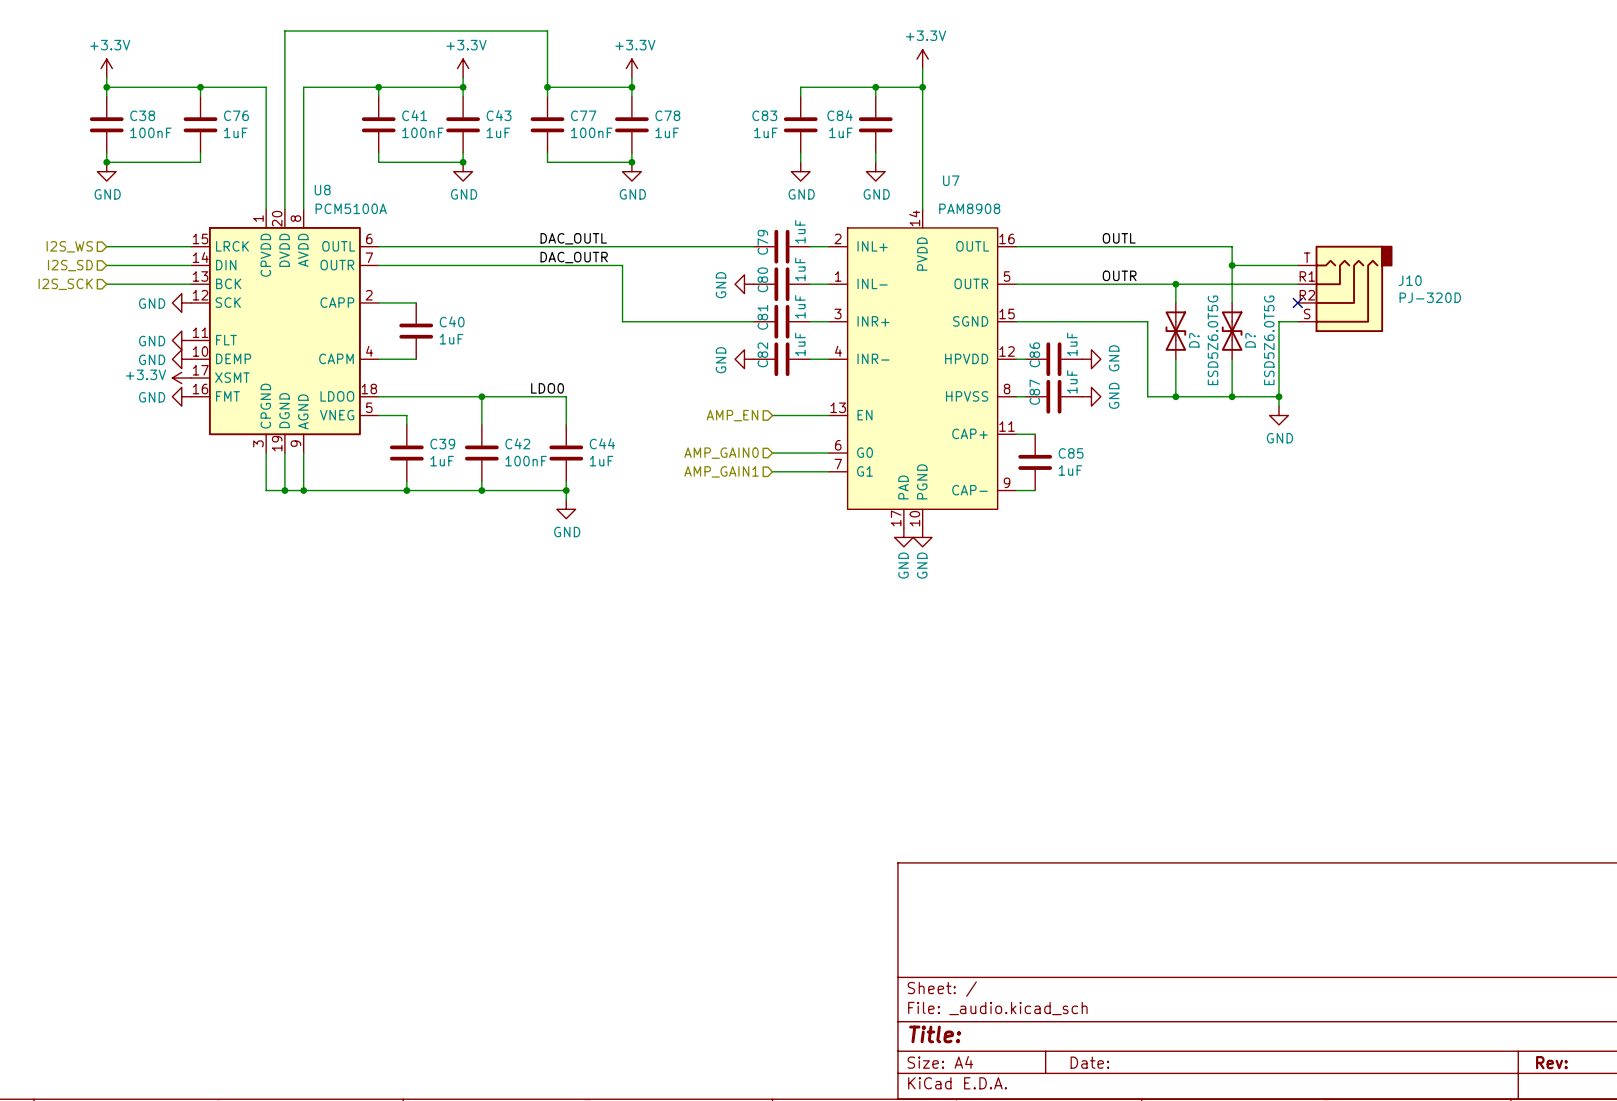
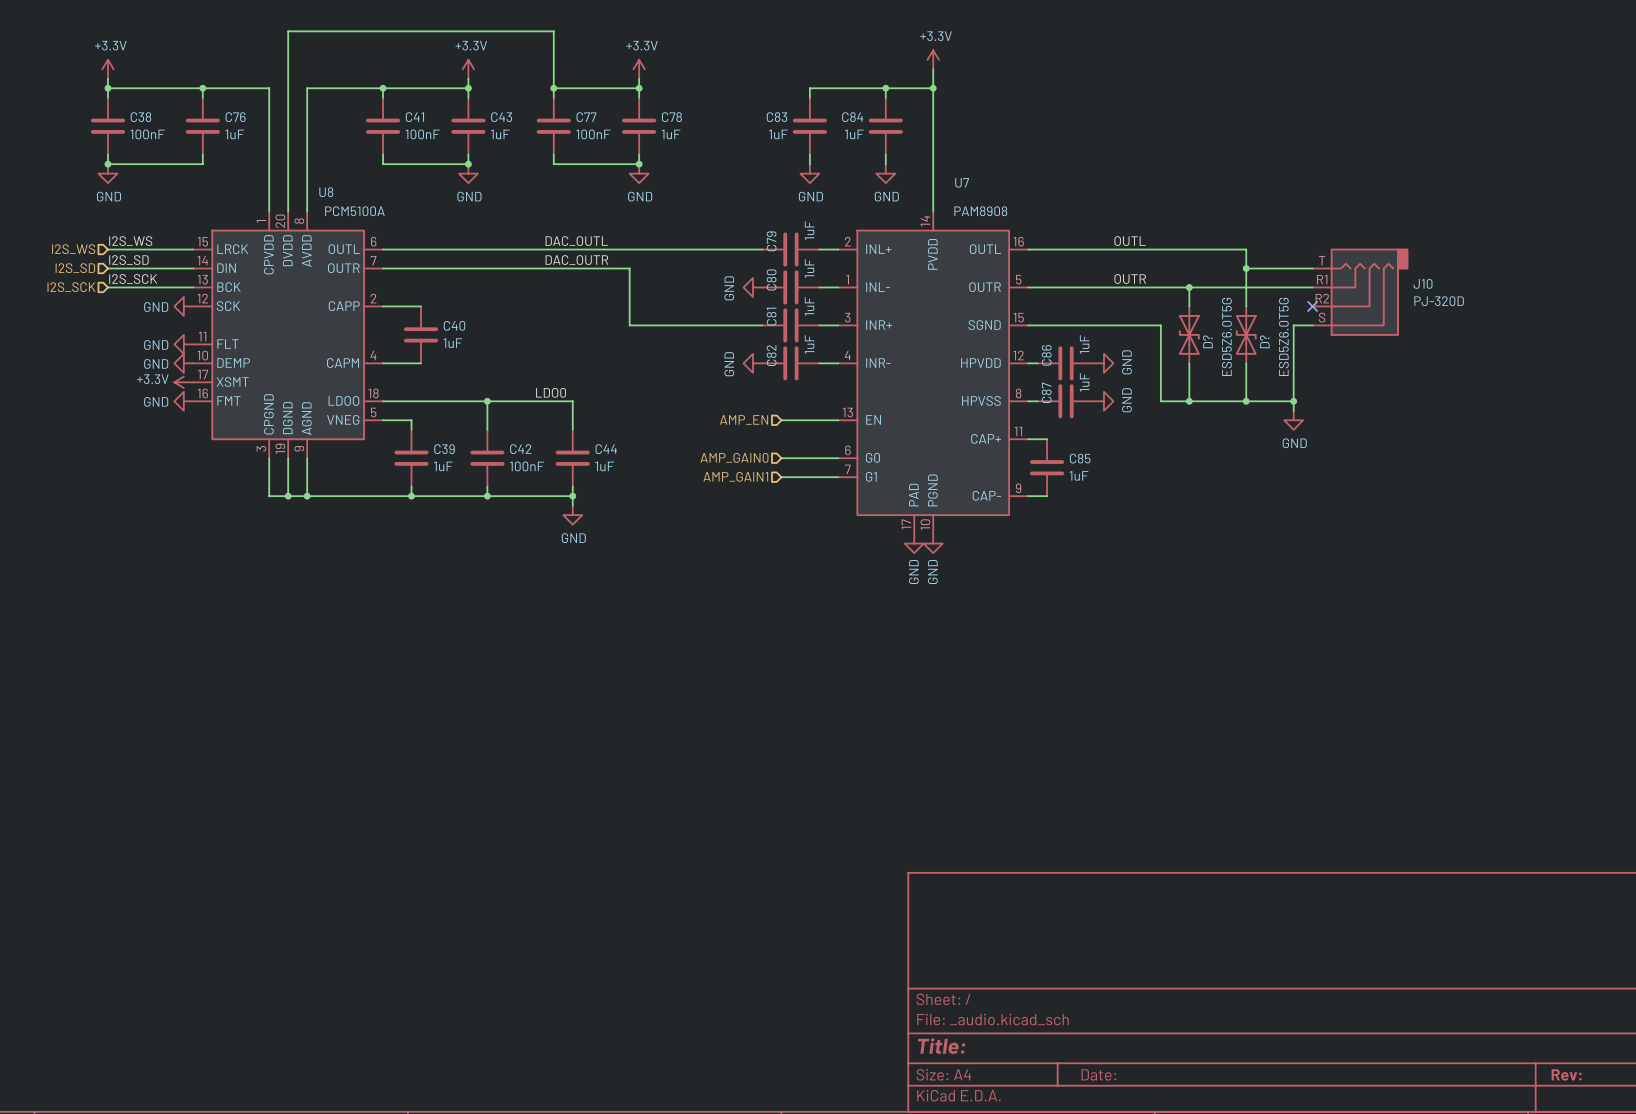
label: none -> I2S_WS (130, 241)
label: none -> I2S_SD (128, 260)
label: none -> I2S_SCK (133, 279)

